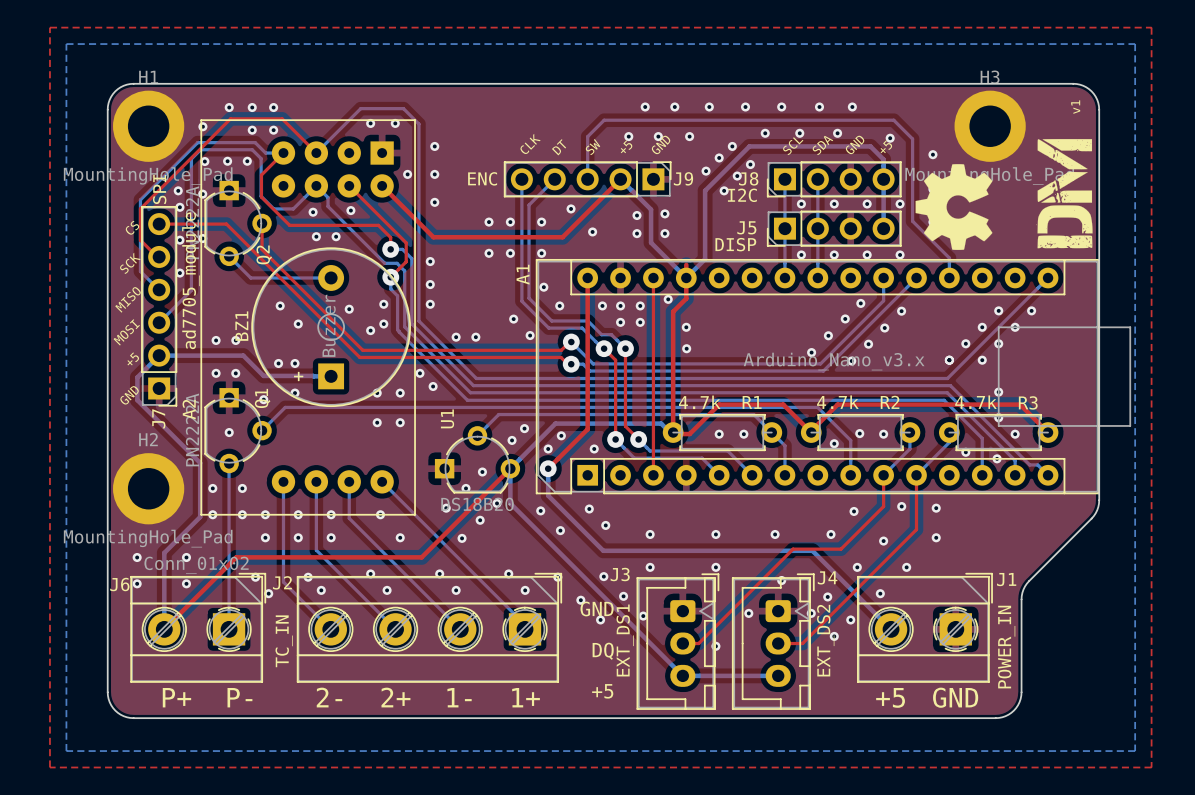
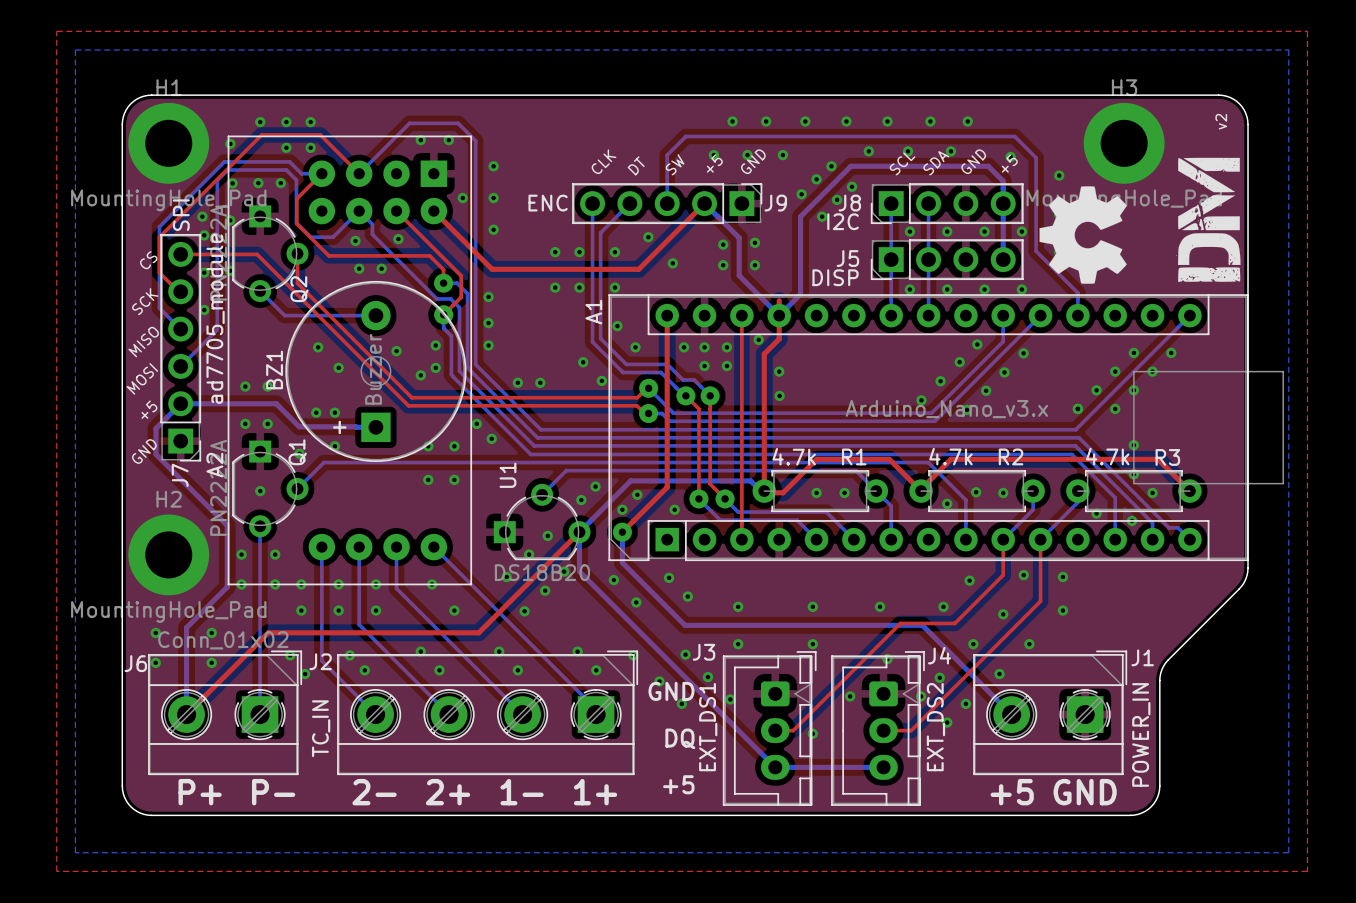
text: v1 (1075, 107) -> v2 (1221, 121)

